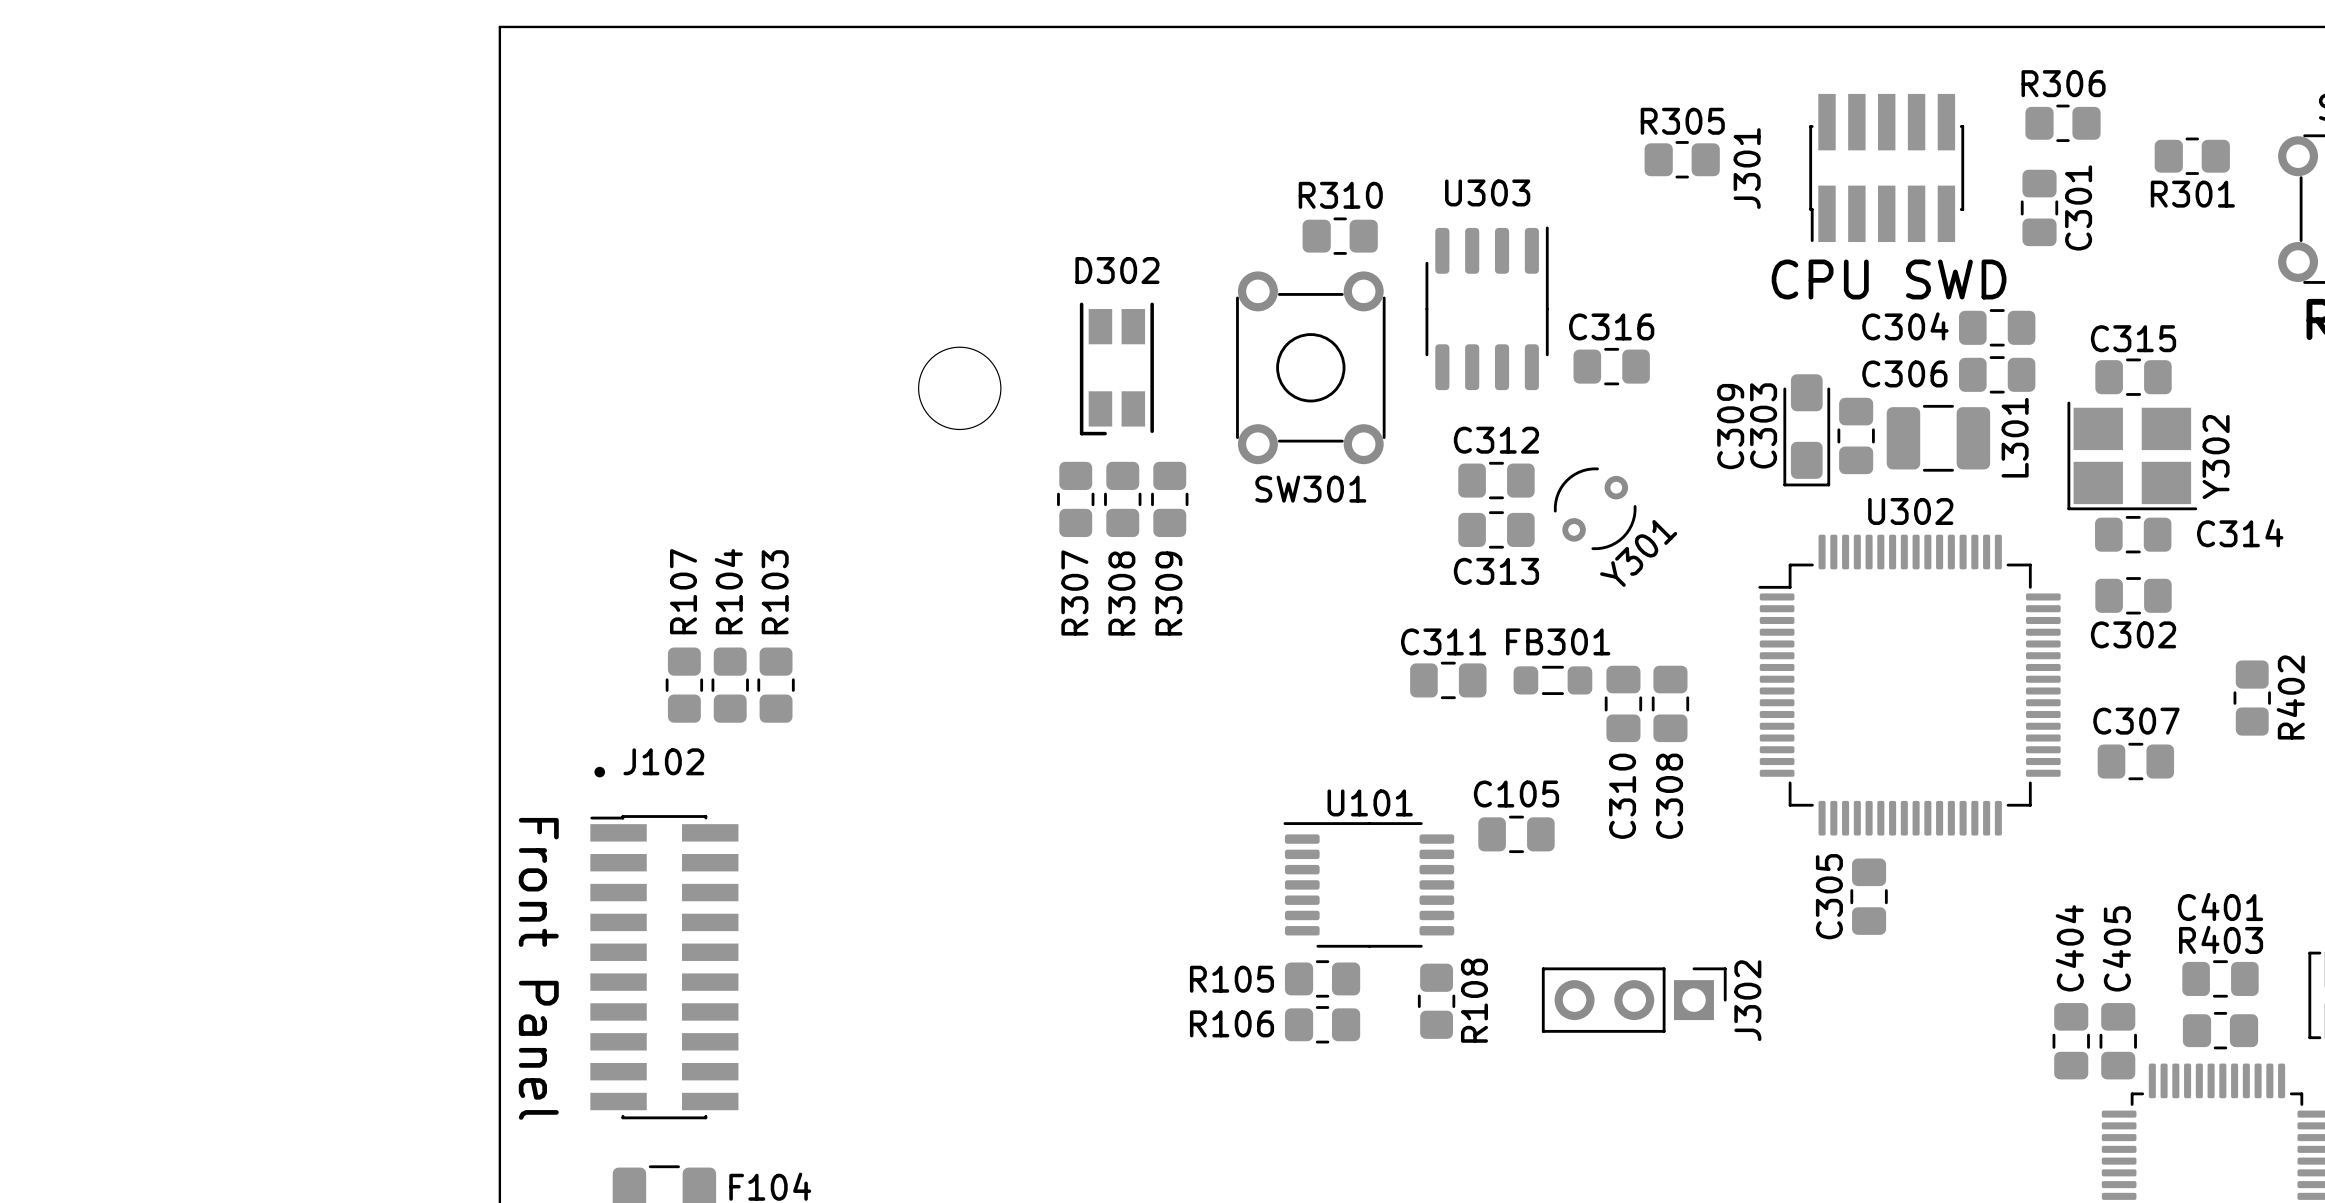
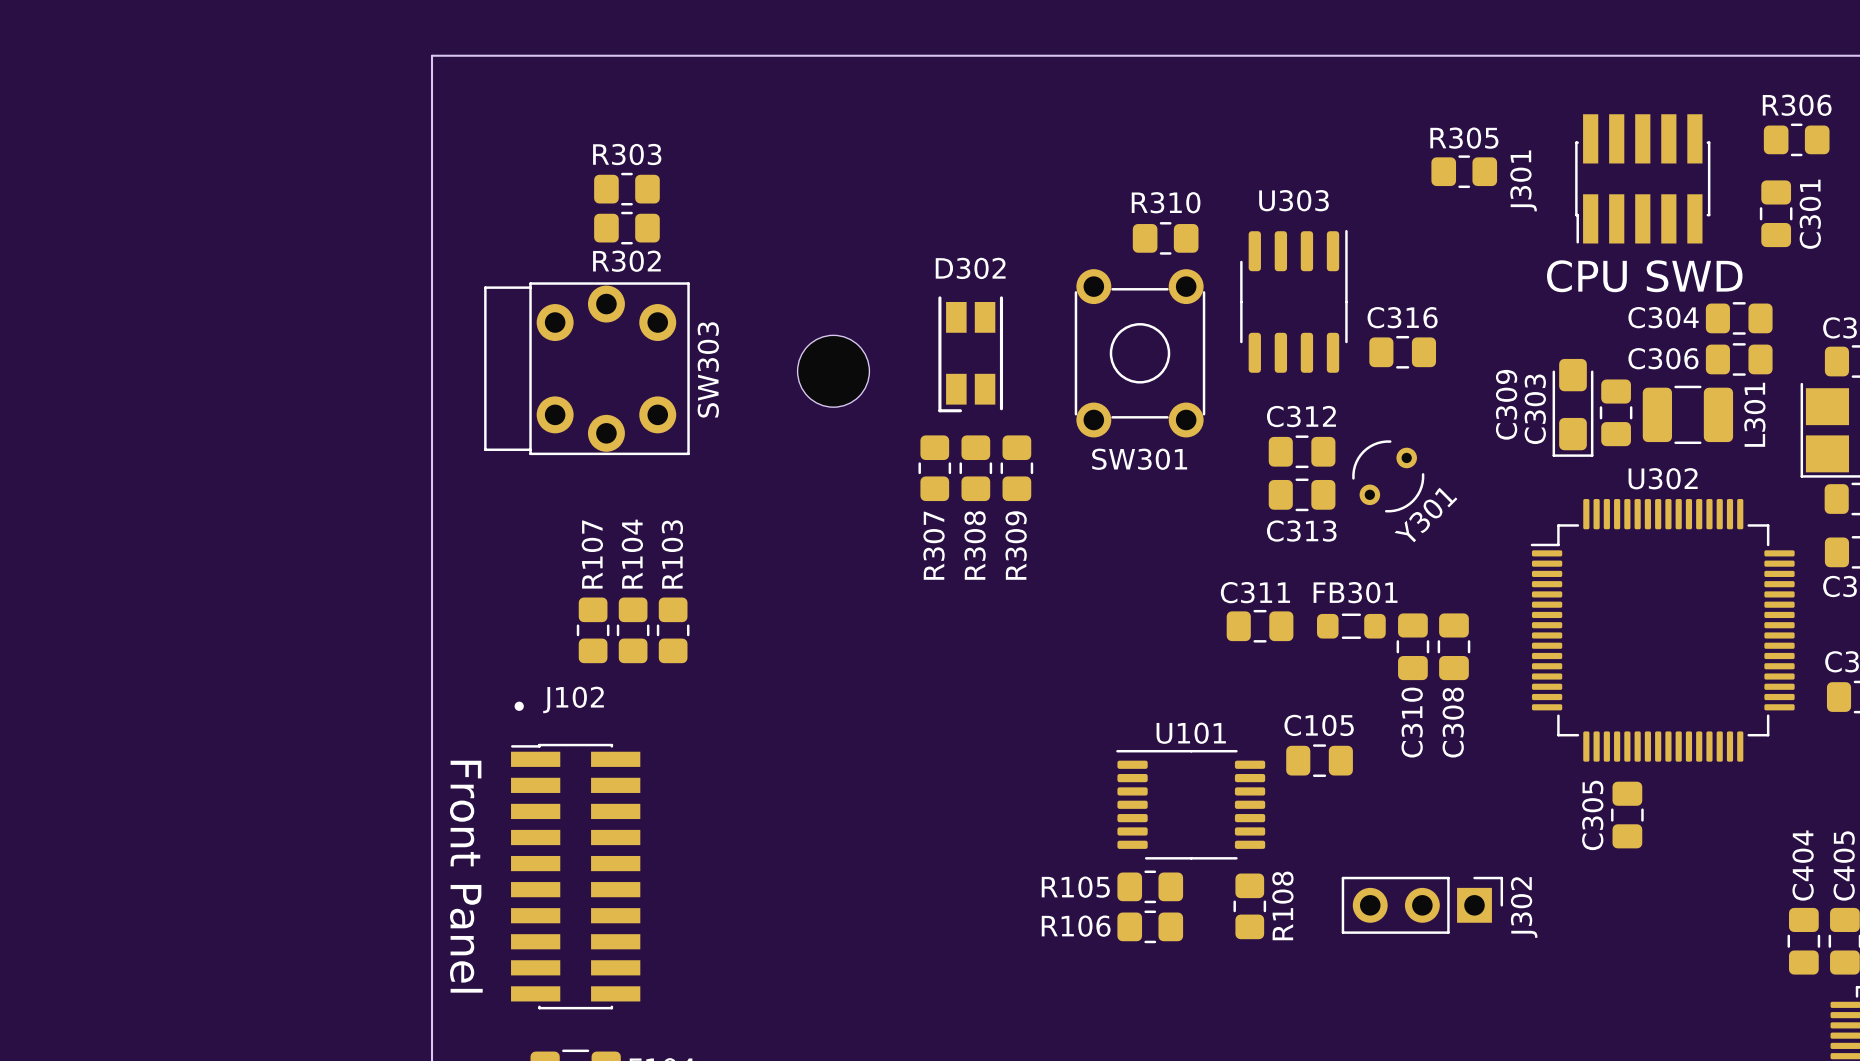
R303: none -> (626, 189)
R302: none -> (626, 228)
SW303: none -> (586, 368)

